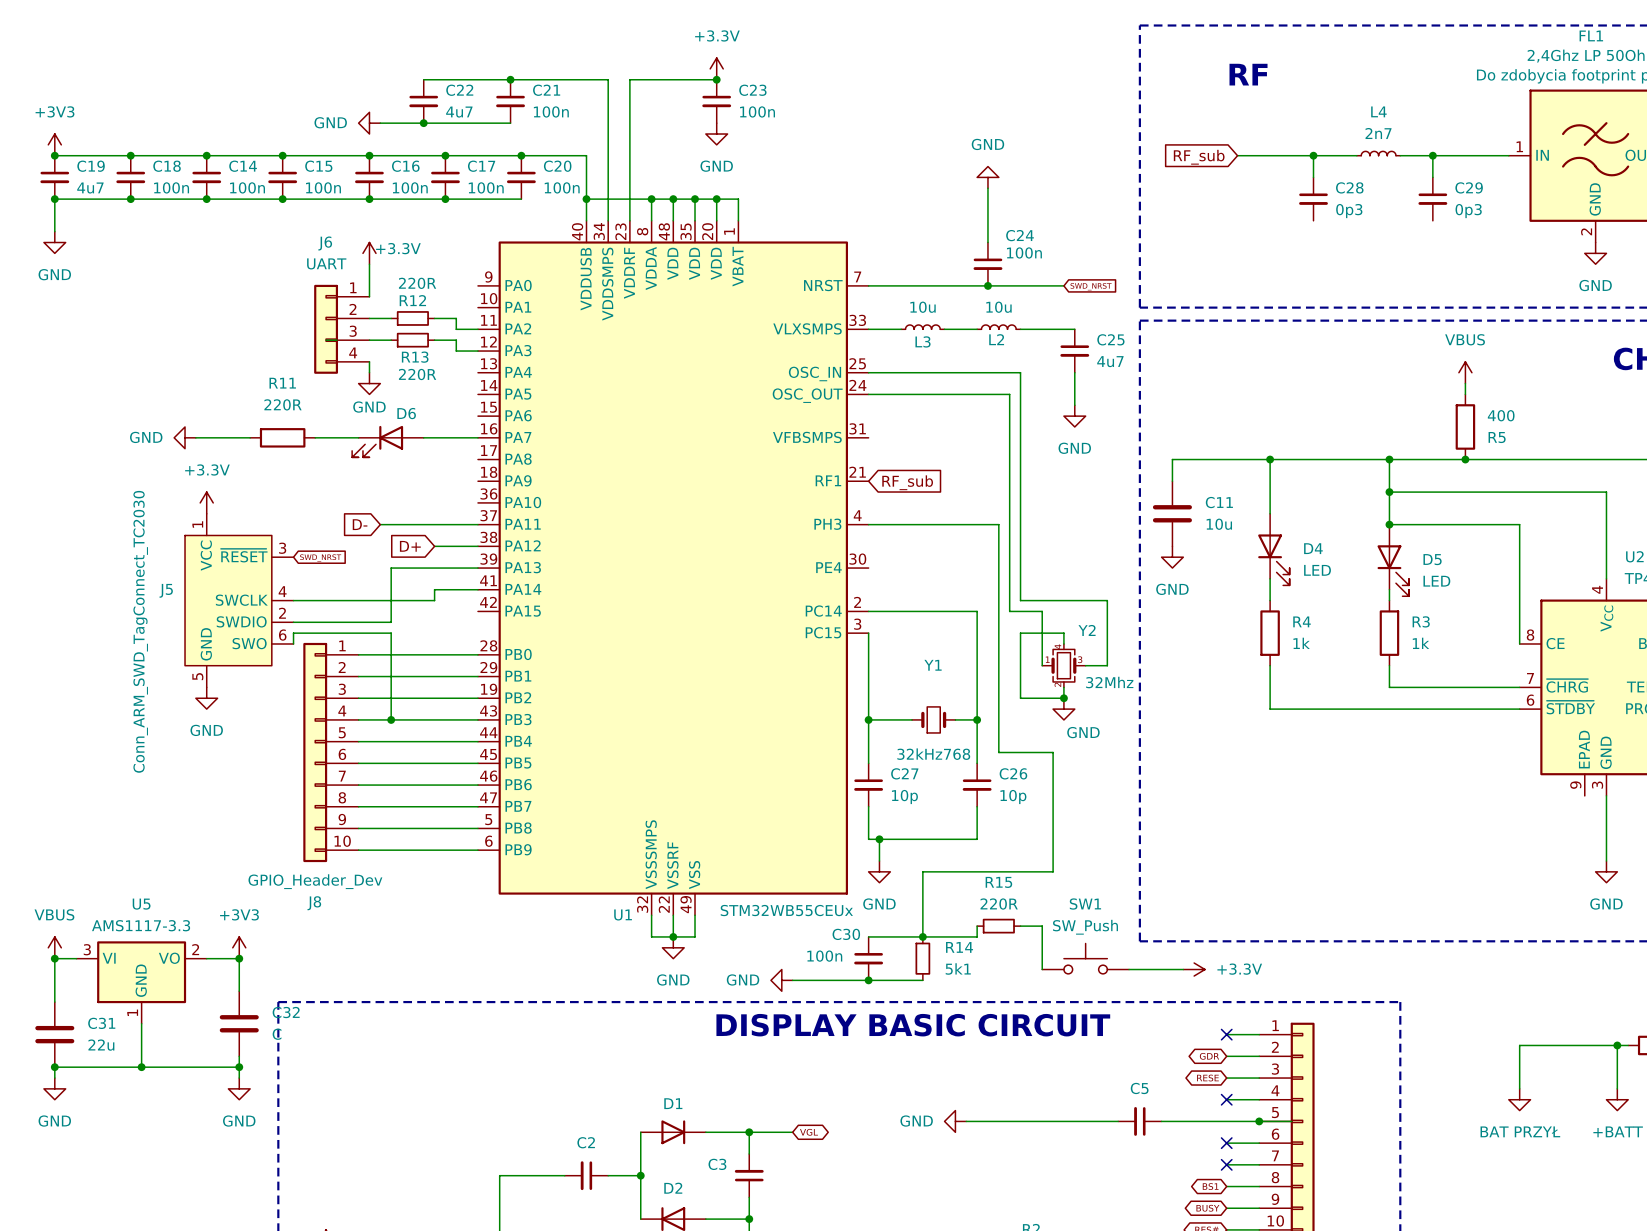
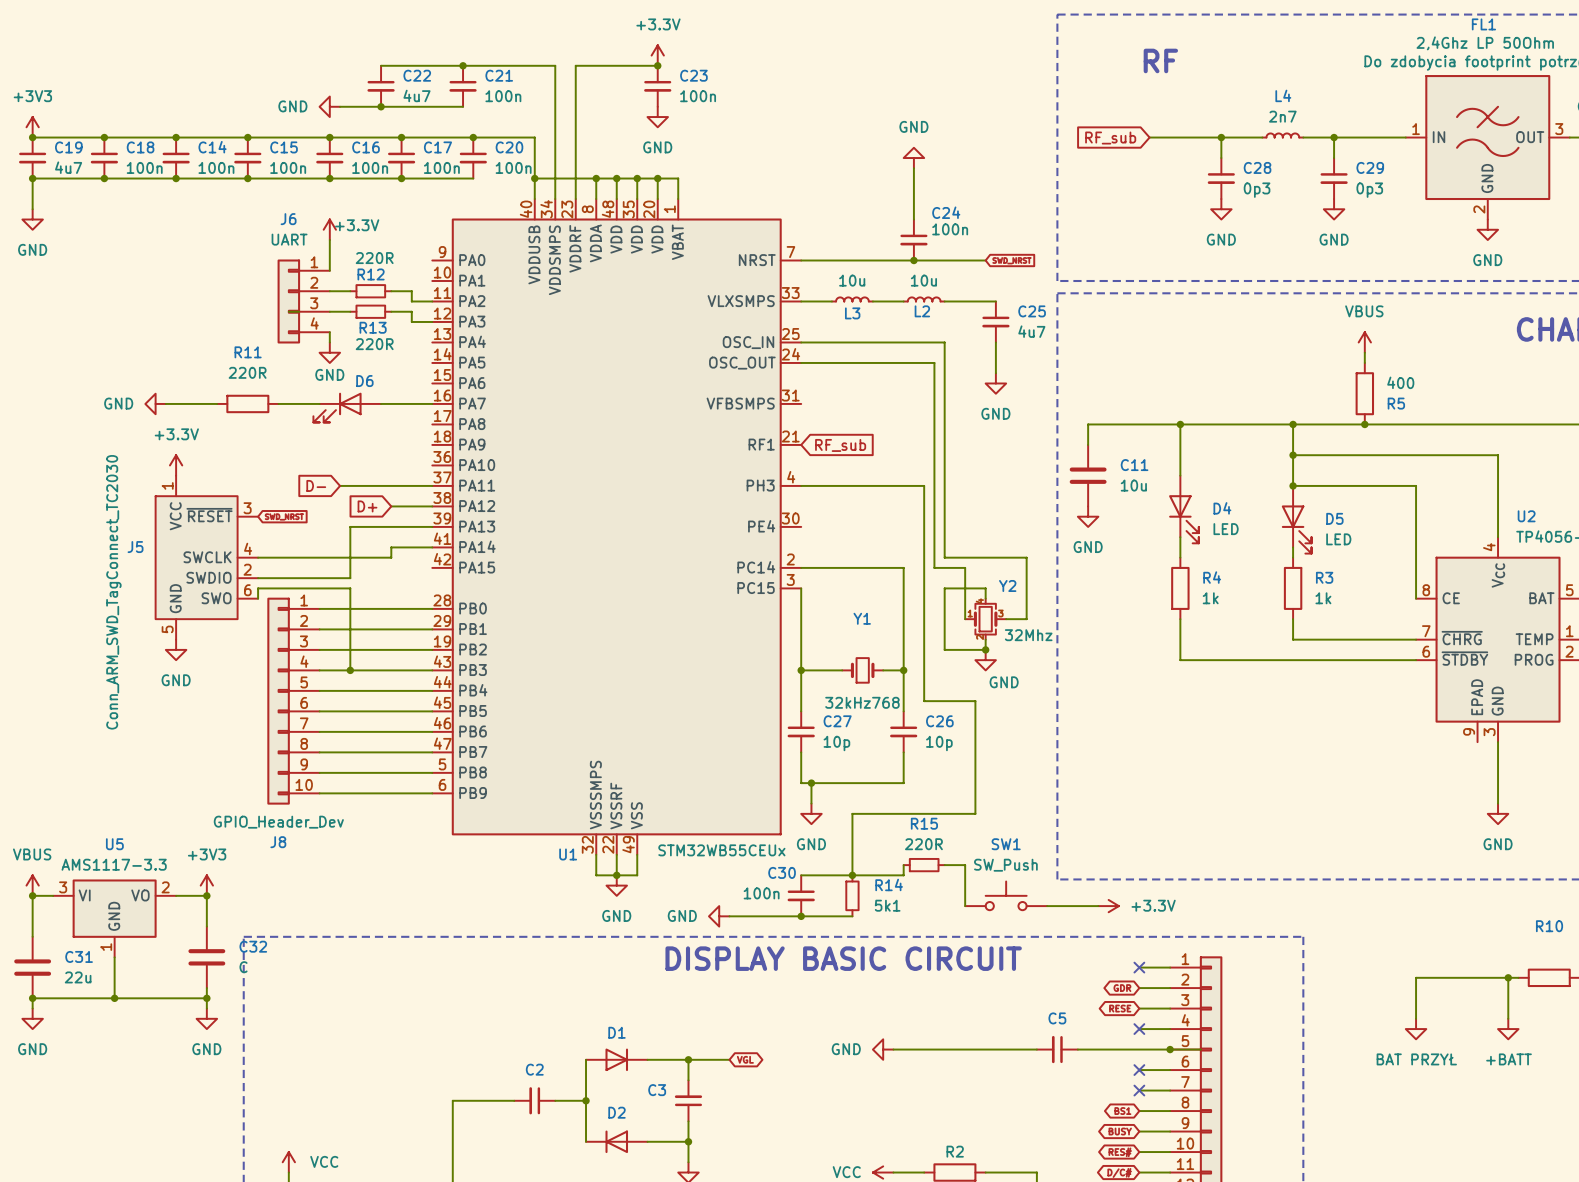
power symbol: none -> GND (1221, 209)
power symbol: none -> GND (1334, 209)

